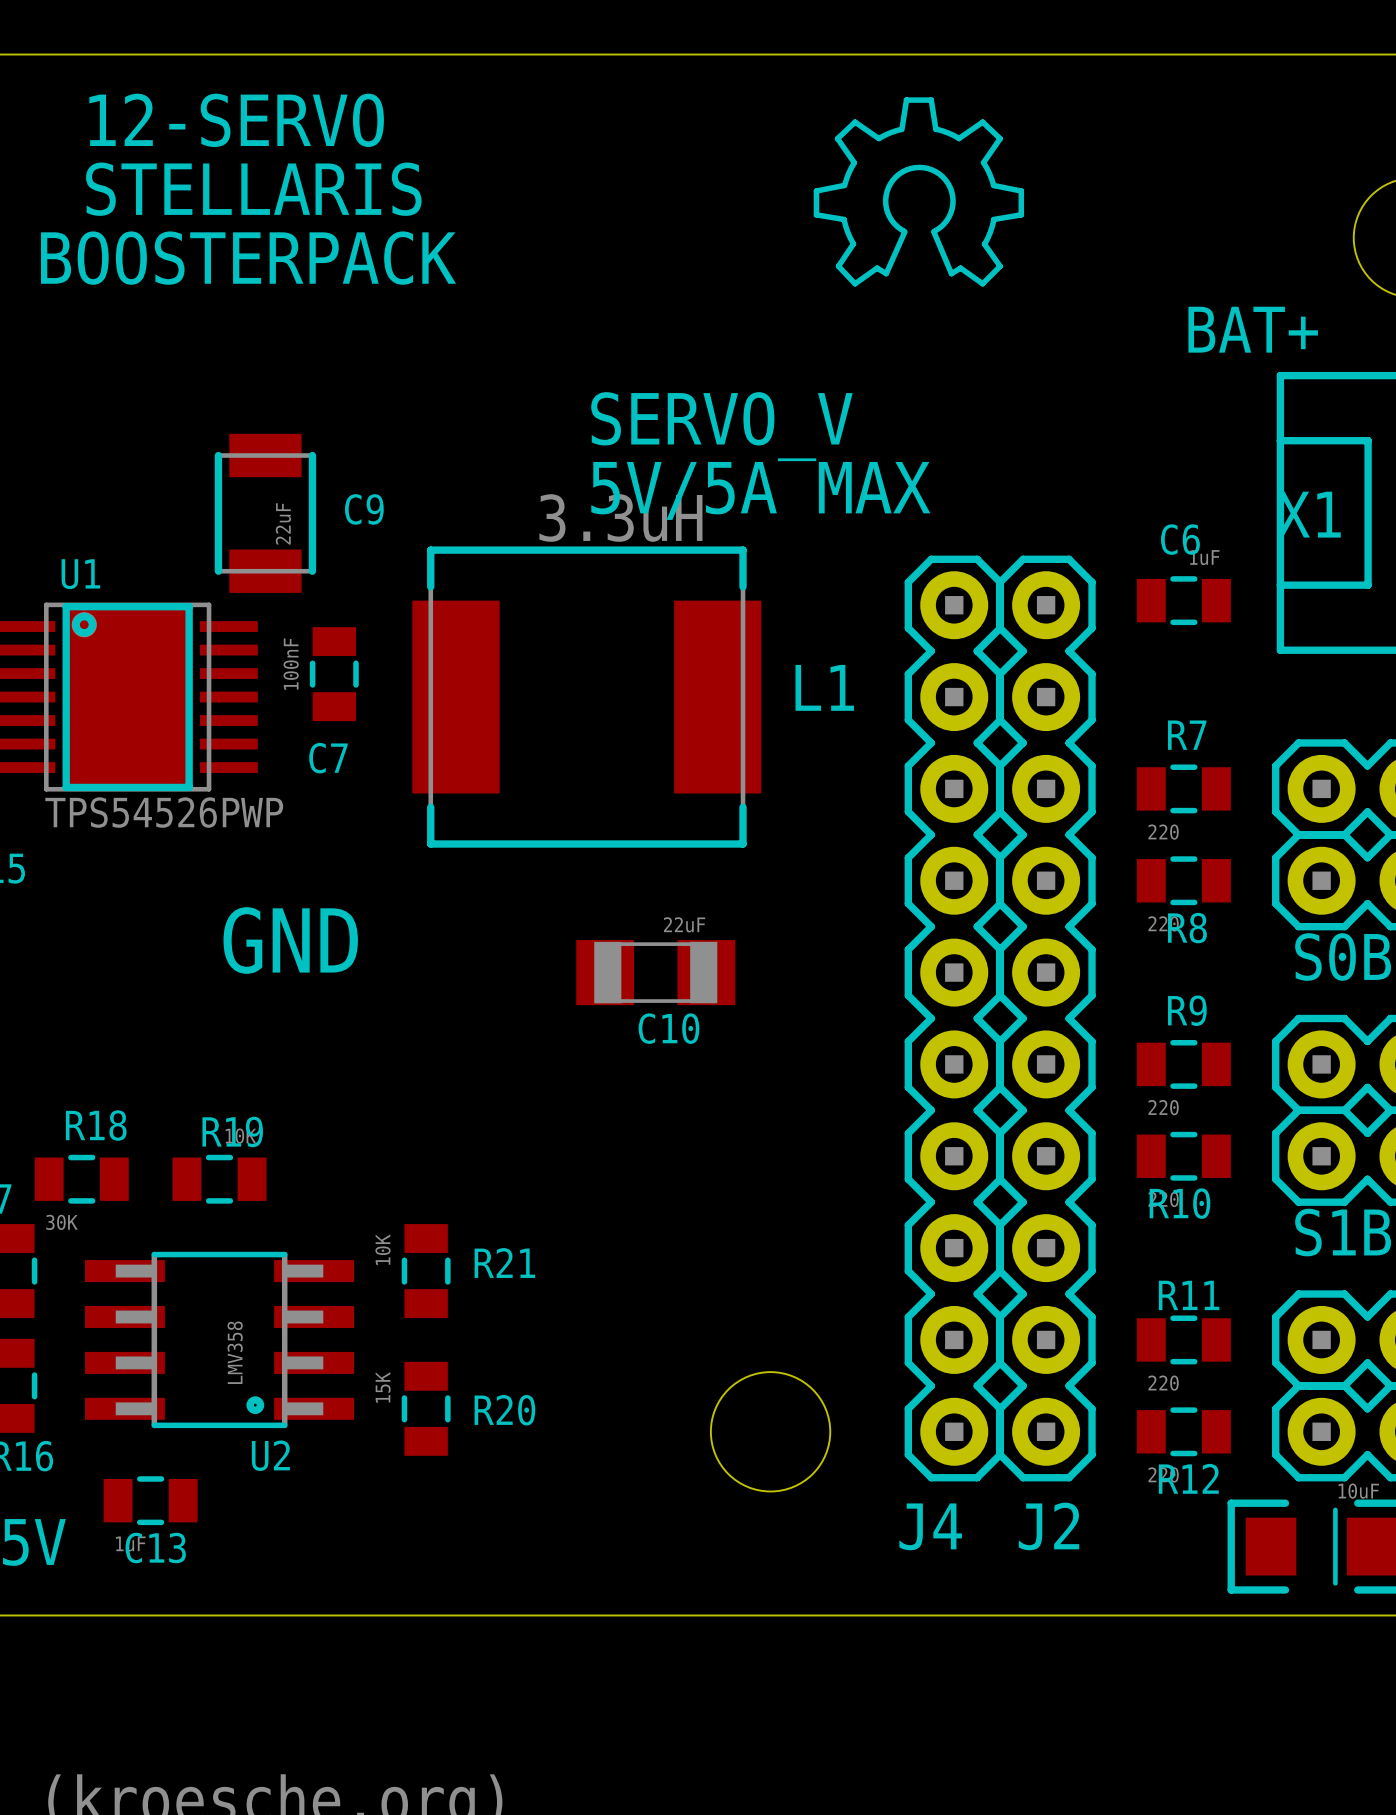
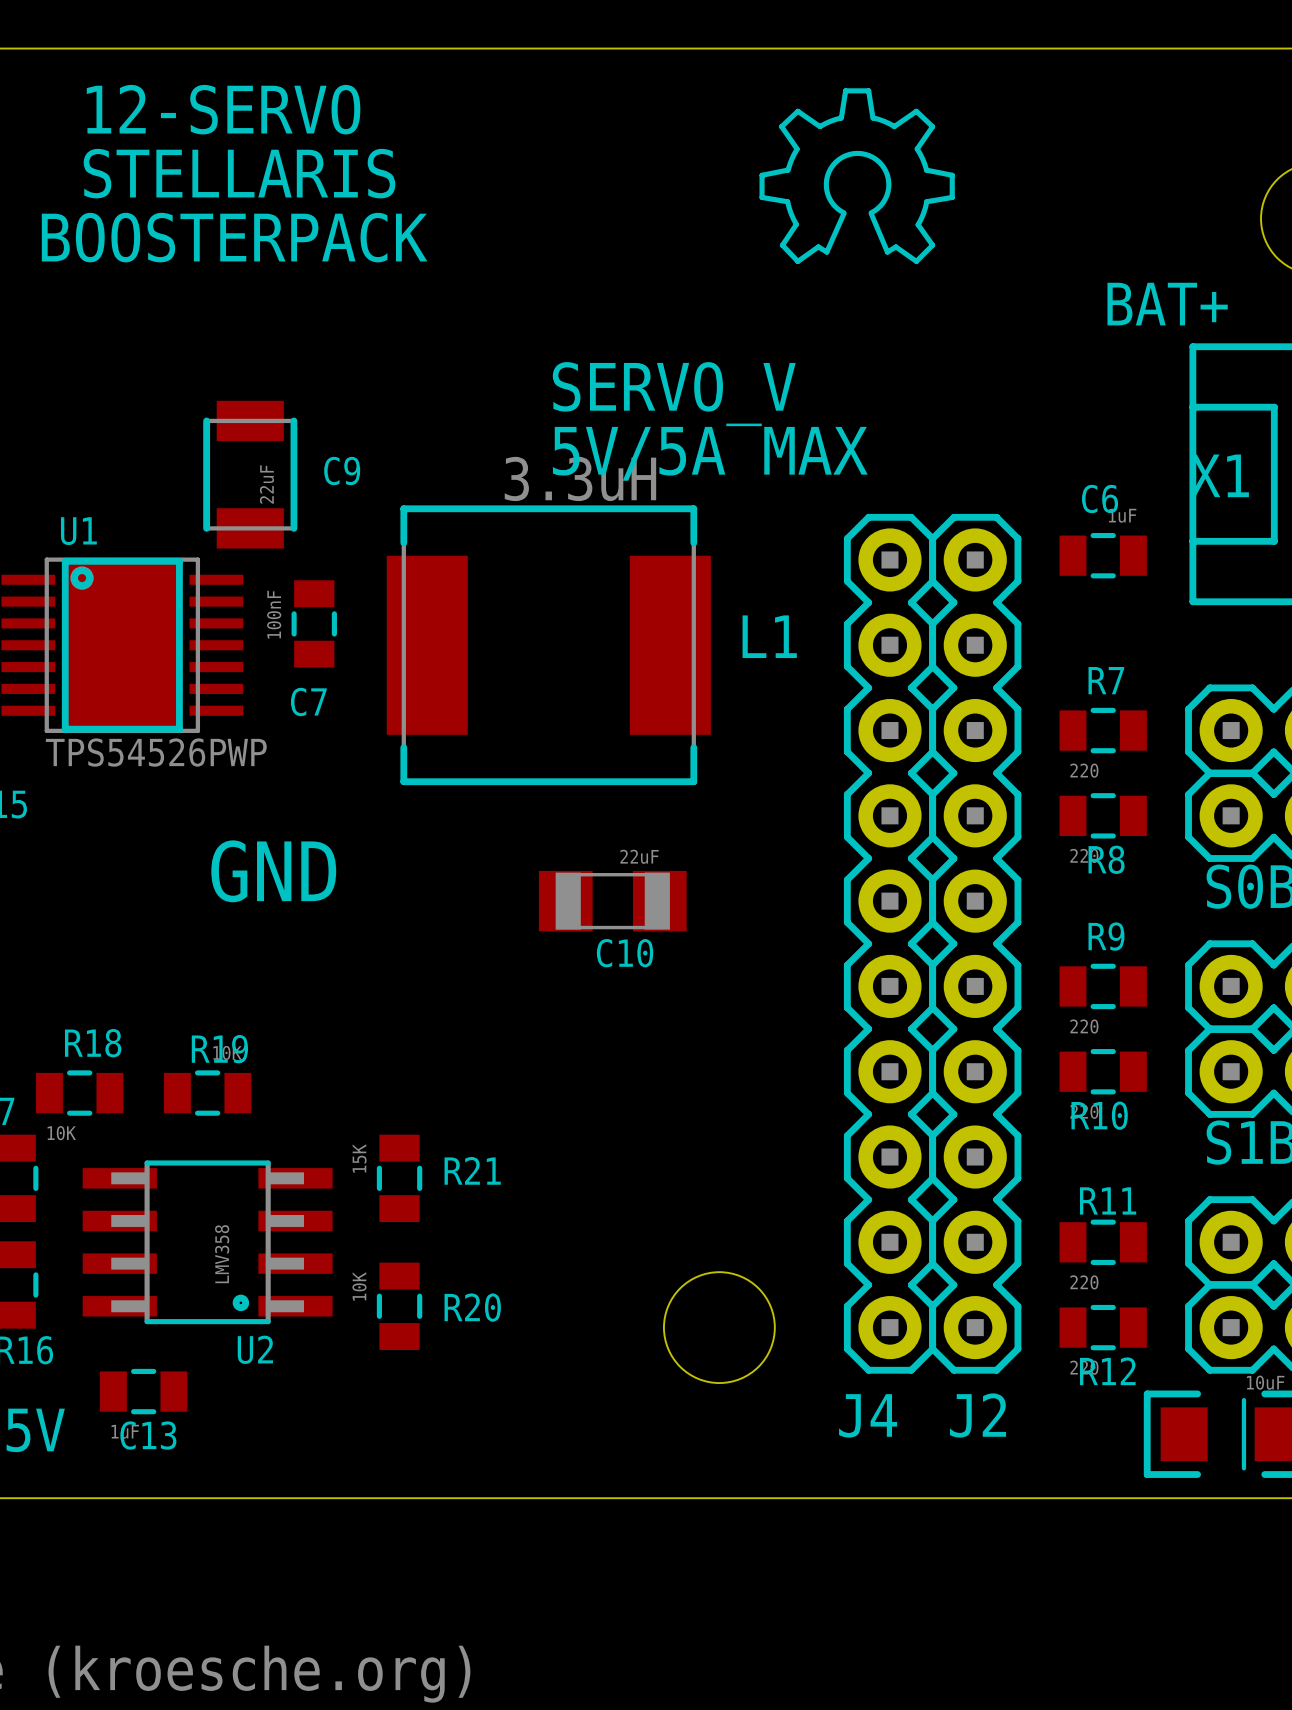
R18 value: 30K (61, 1222) -> 10K (61, 1133)
R21 value: 10K (383, 1249) -> 15K (359, 1158)
R20 value: 15K (383, 1387) -> 10K (359, 1286)

